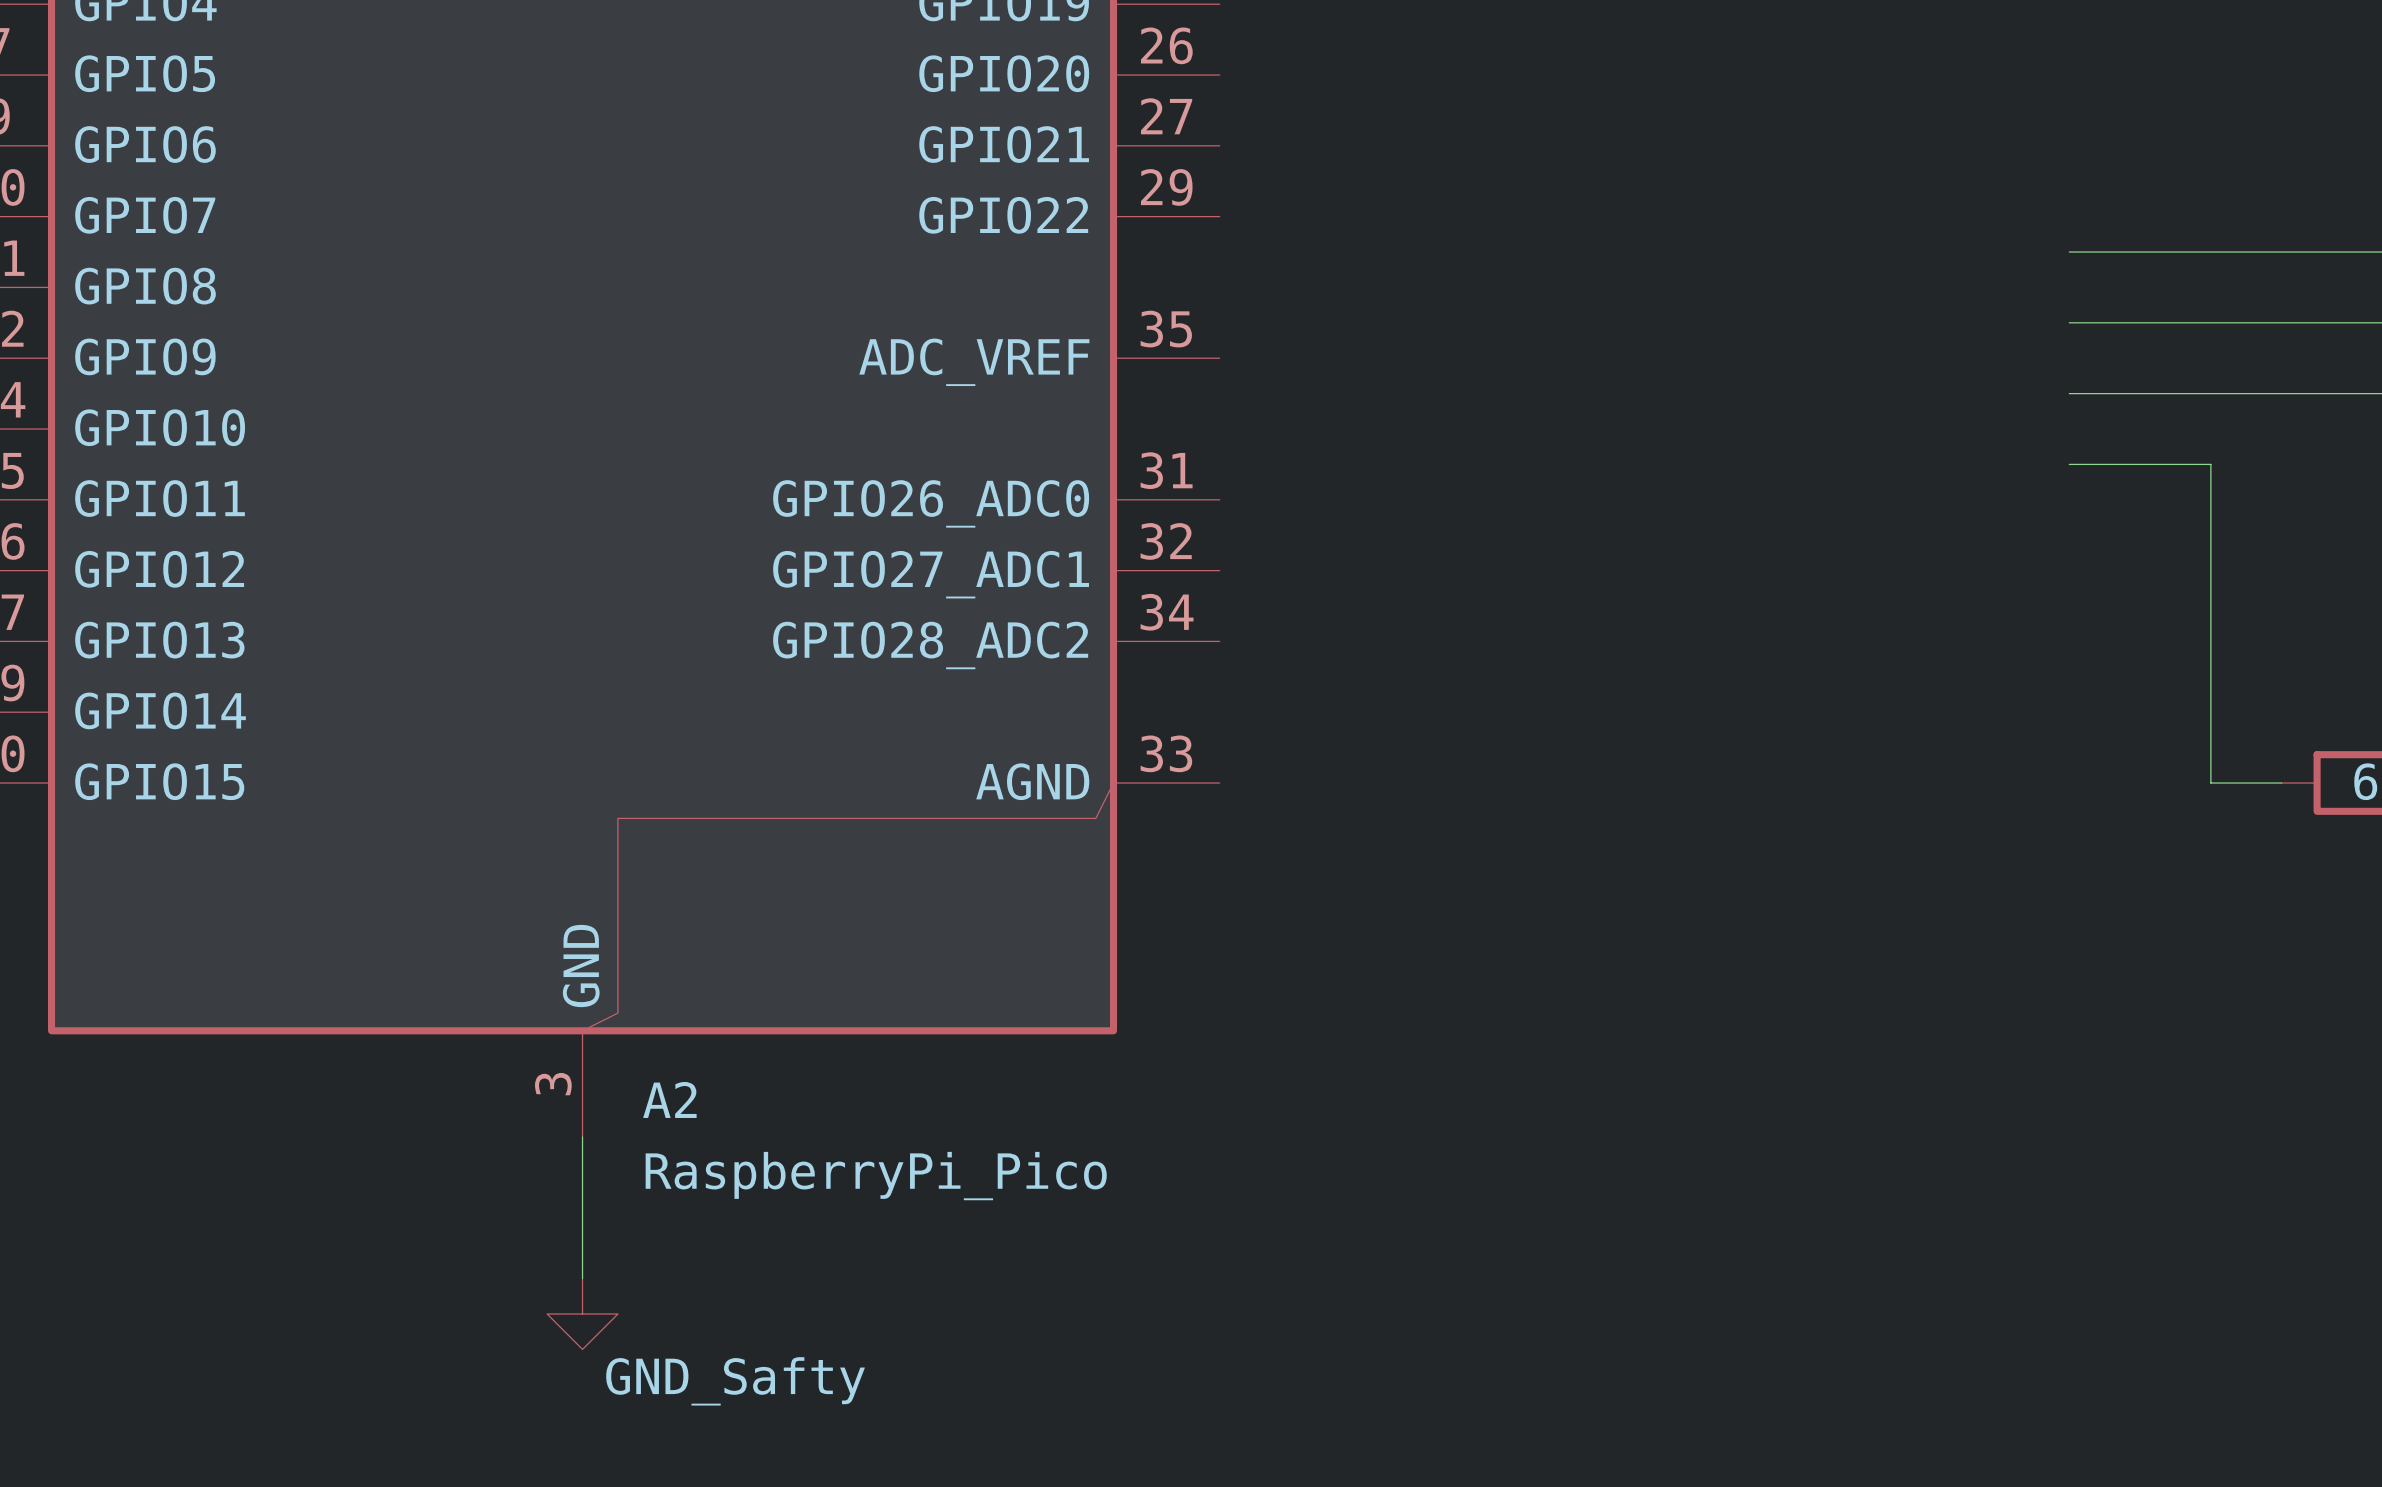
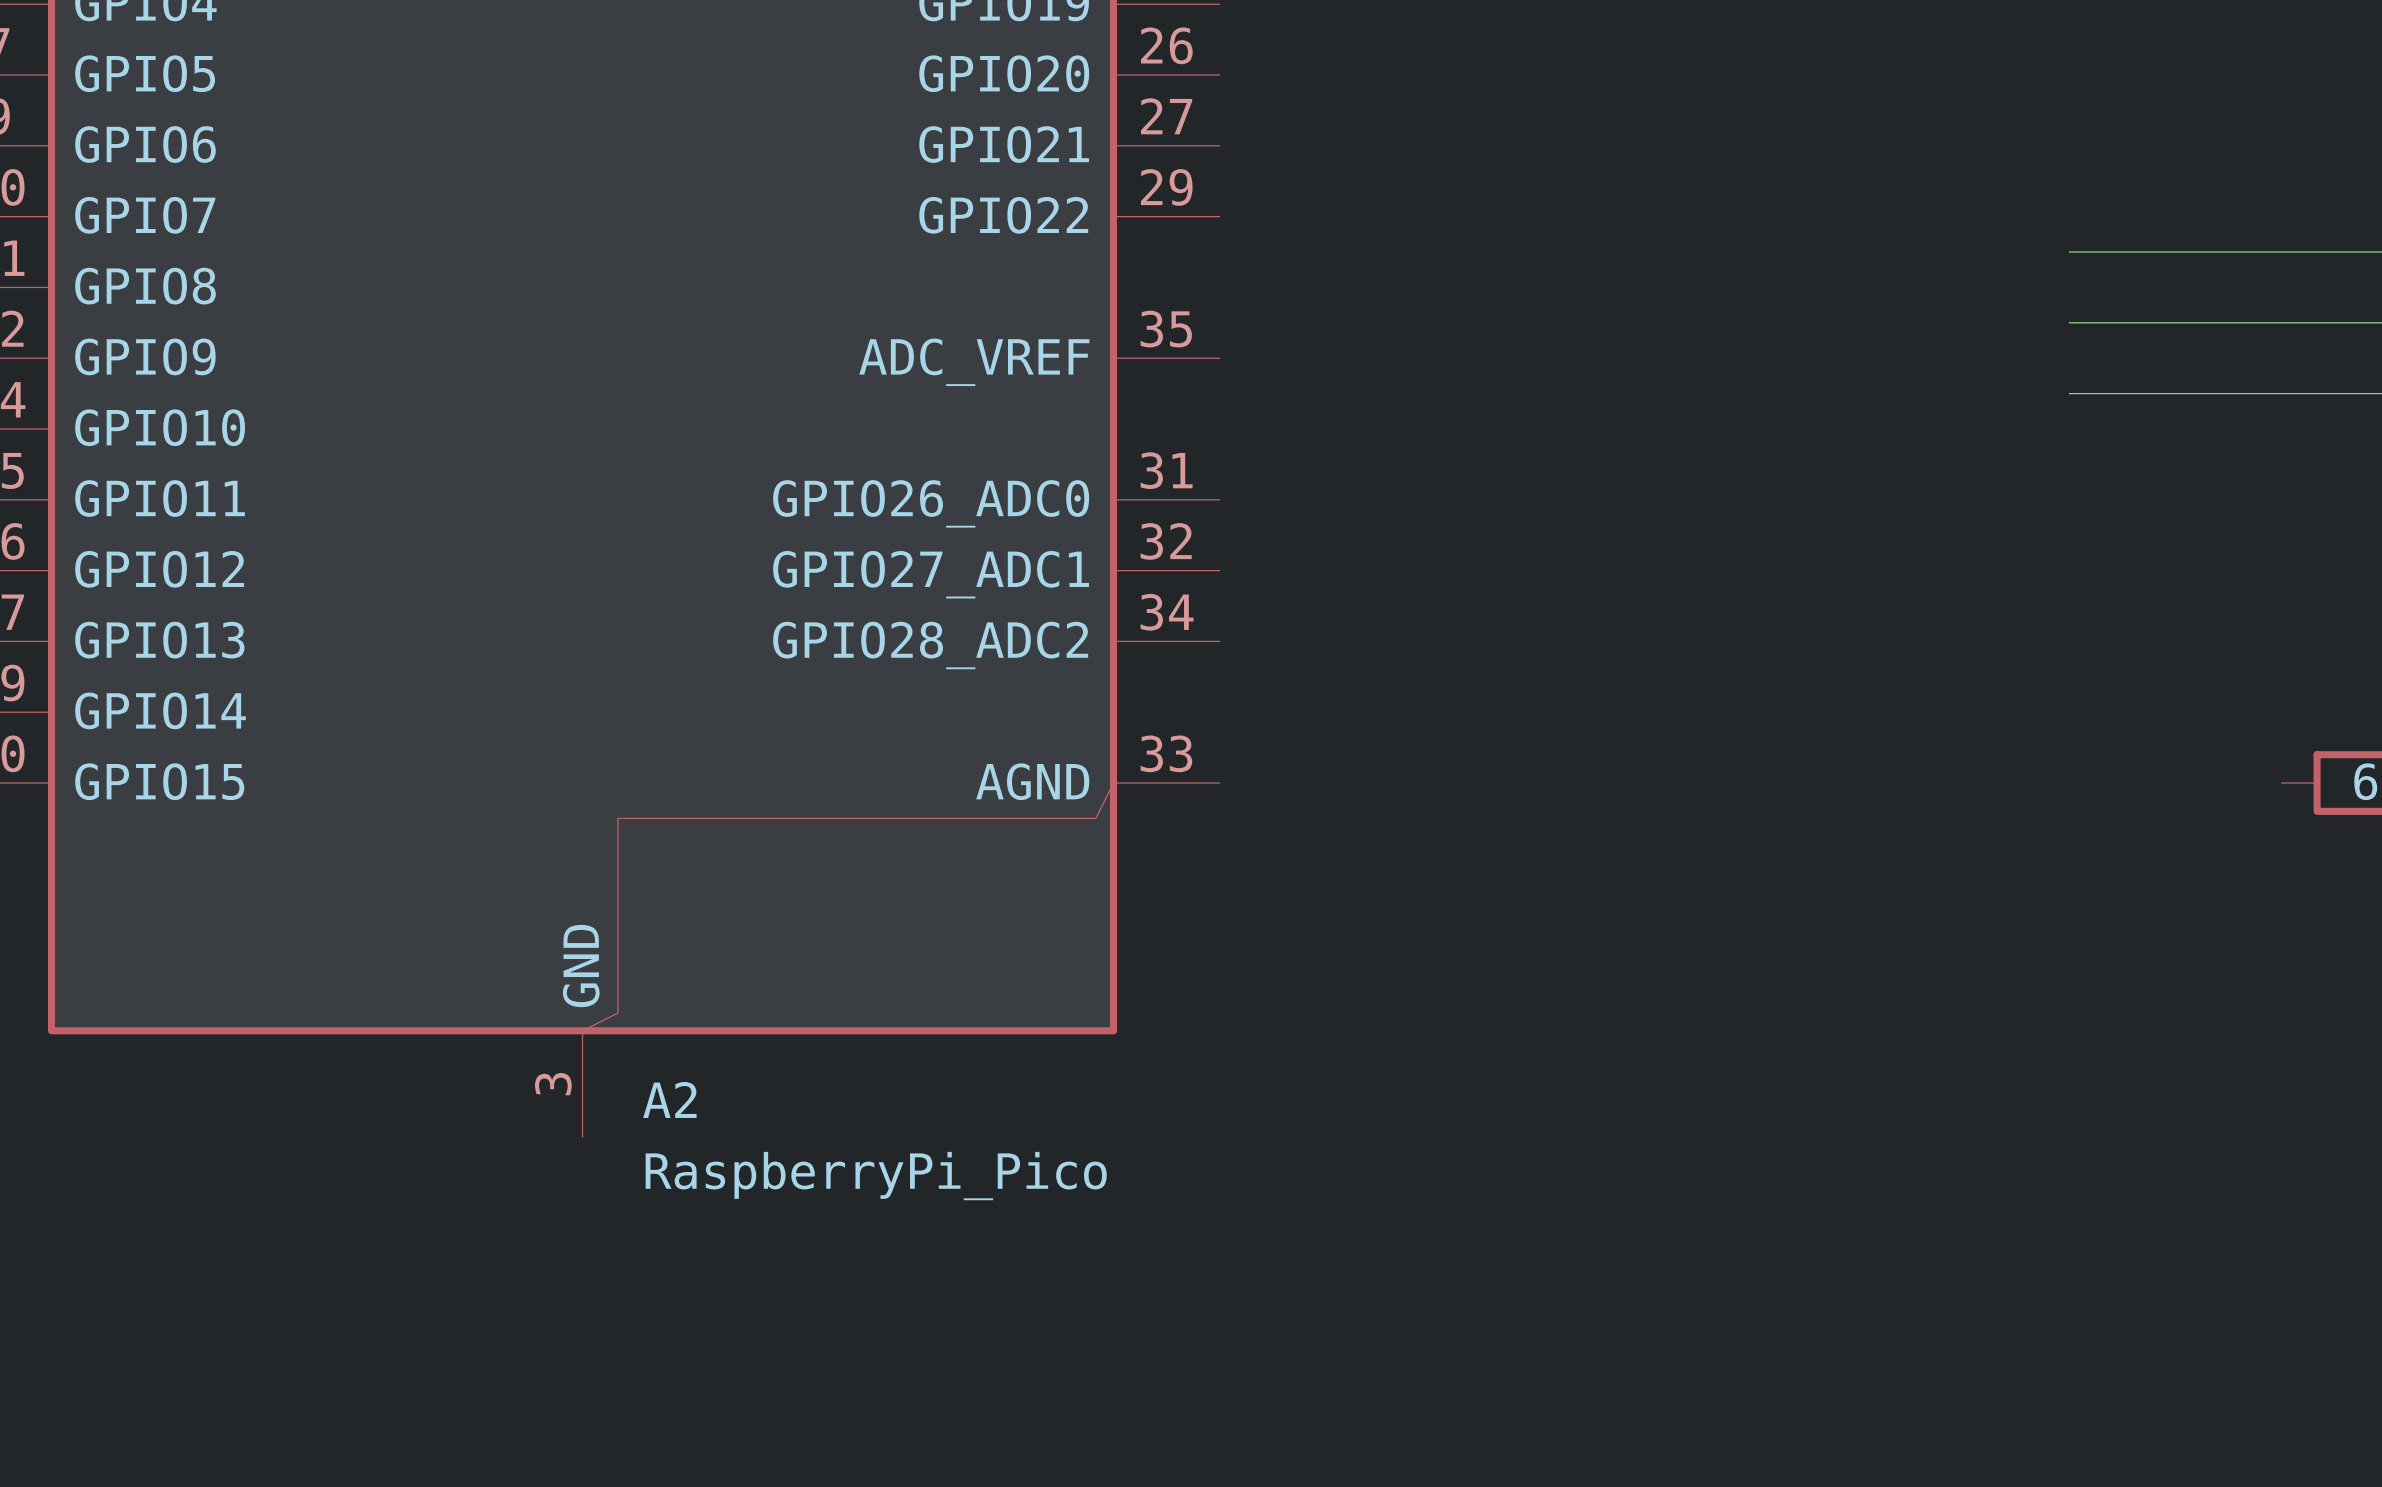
wire: (2069, 464) (2210, 464) (2210, 783) (2281, 783) -> none
wire: (582, 1137) (582, 1278) -> none
power symbol: GND_Safty (582, 1314) -> none

